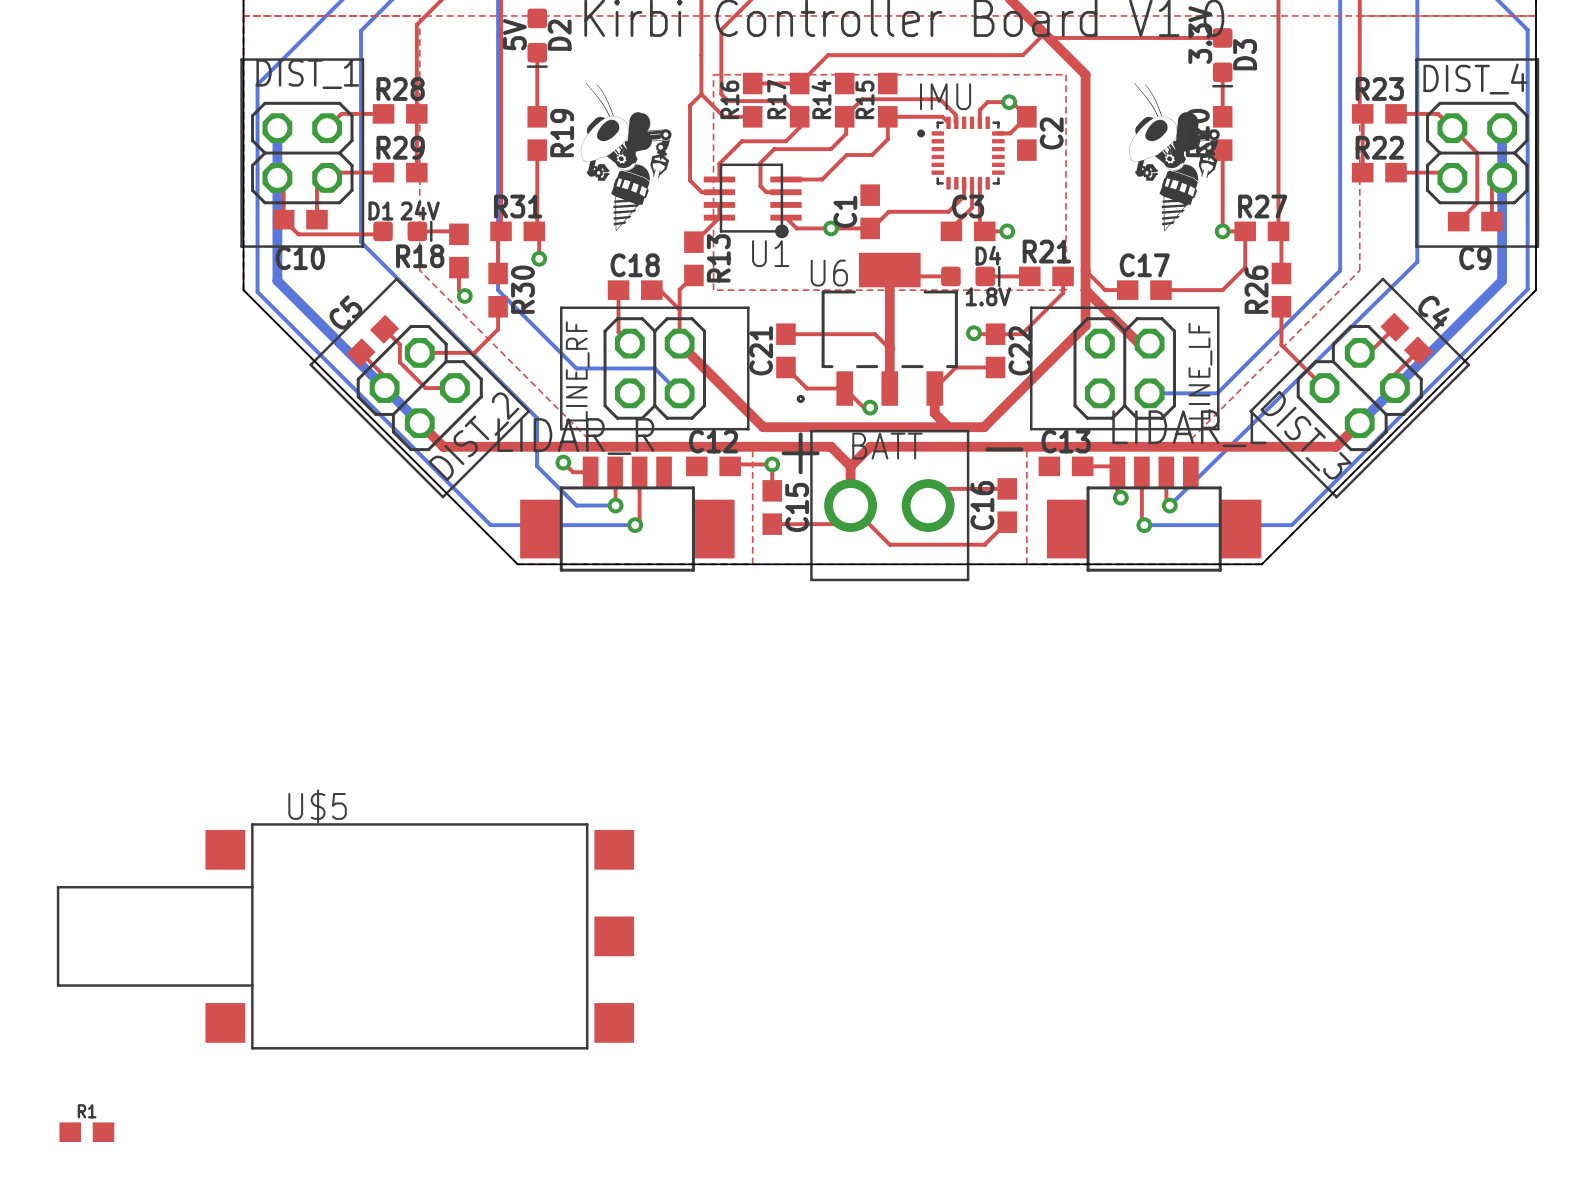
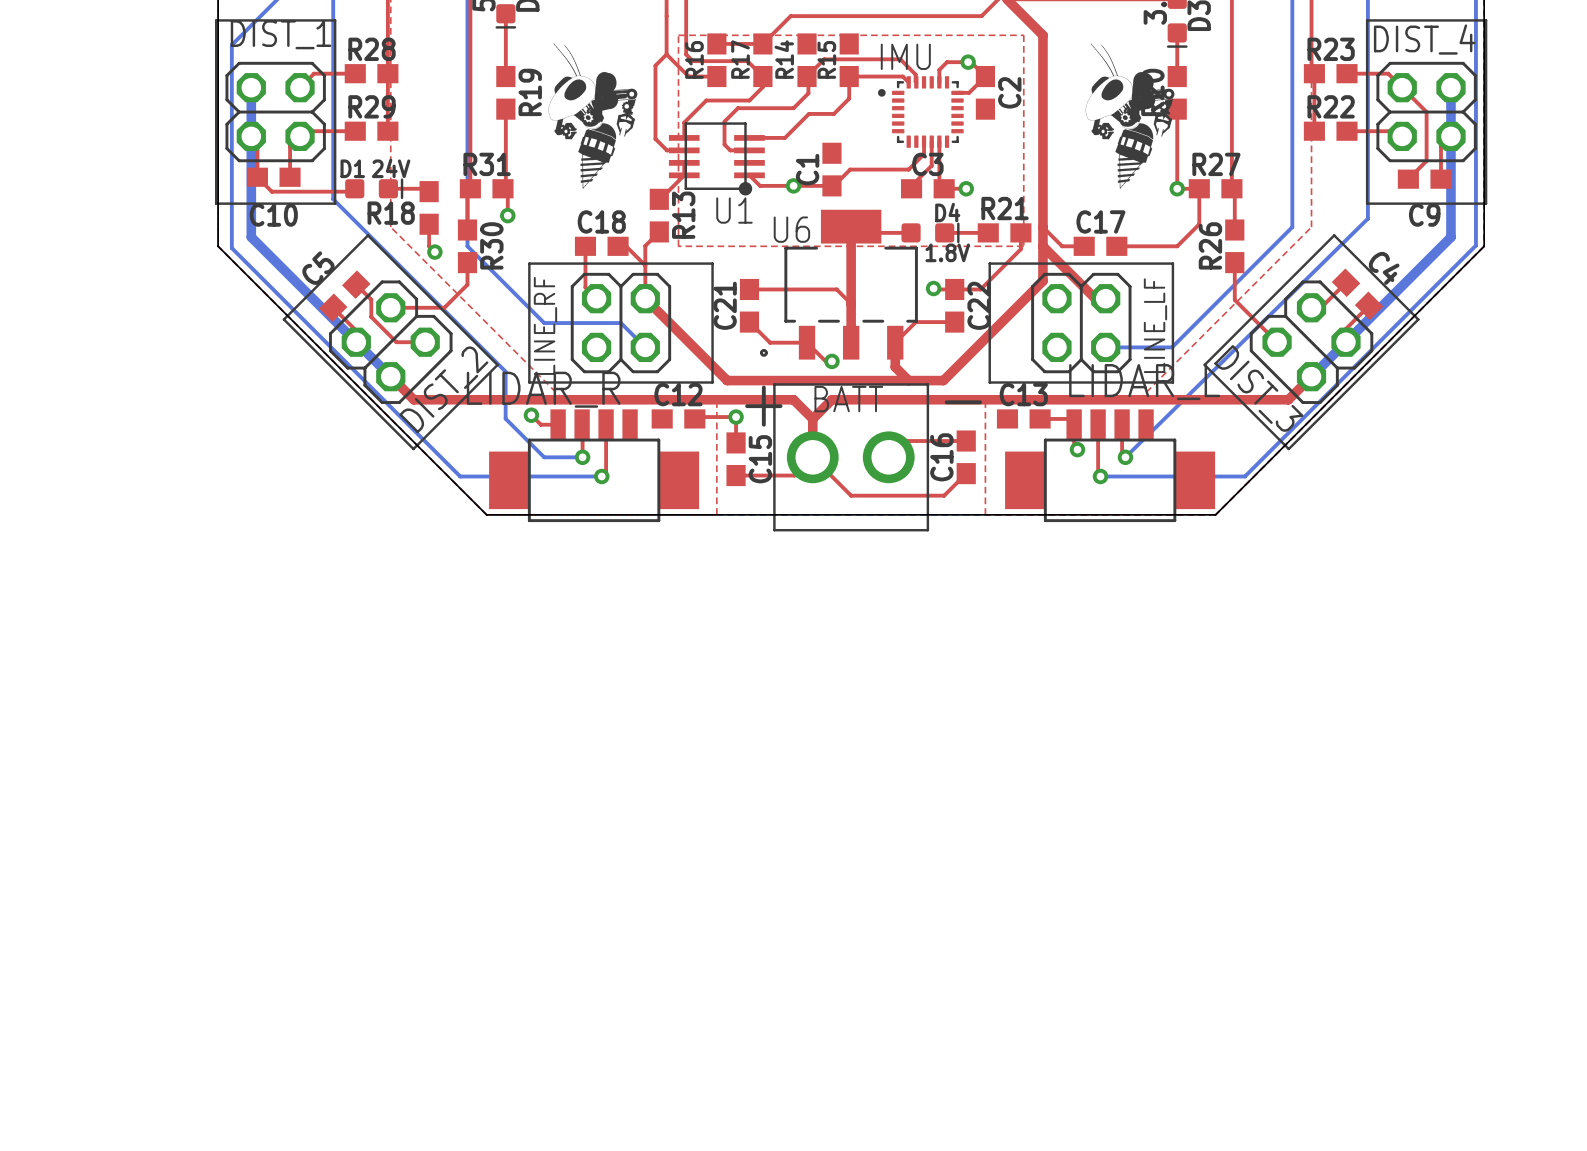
U$5: (345, 936) -> none
R1: (86, 1132) -> none

